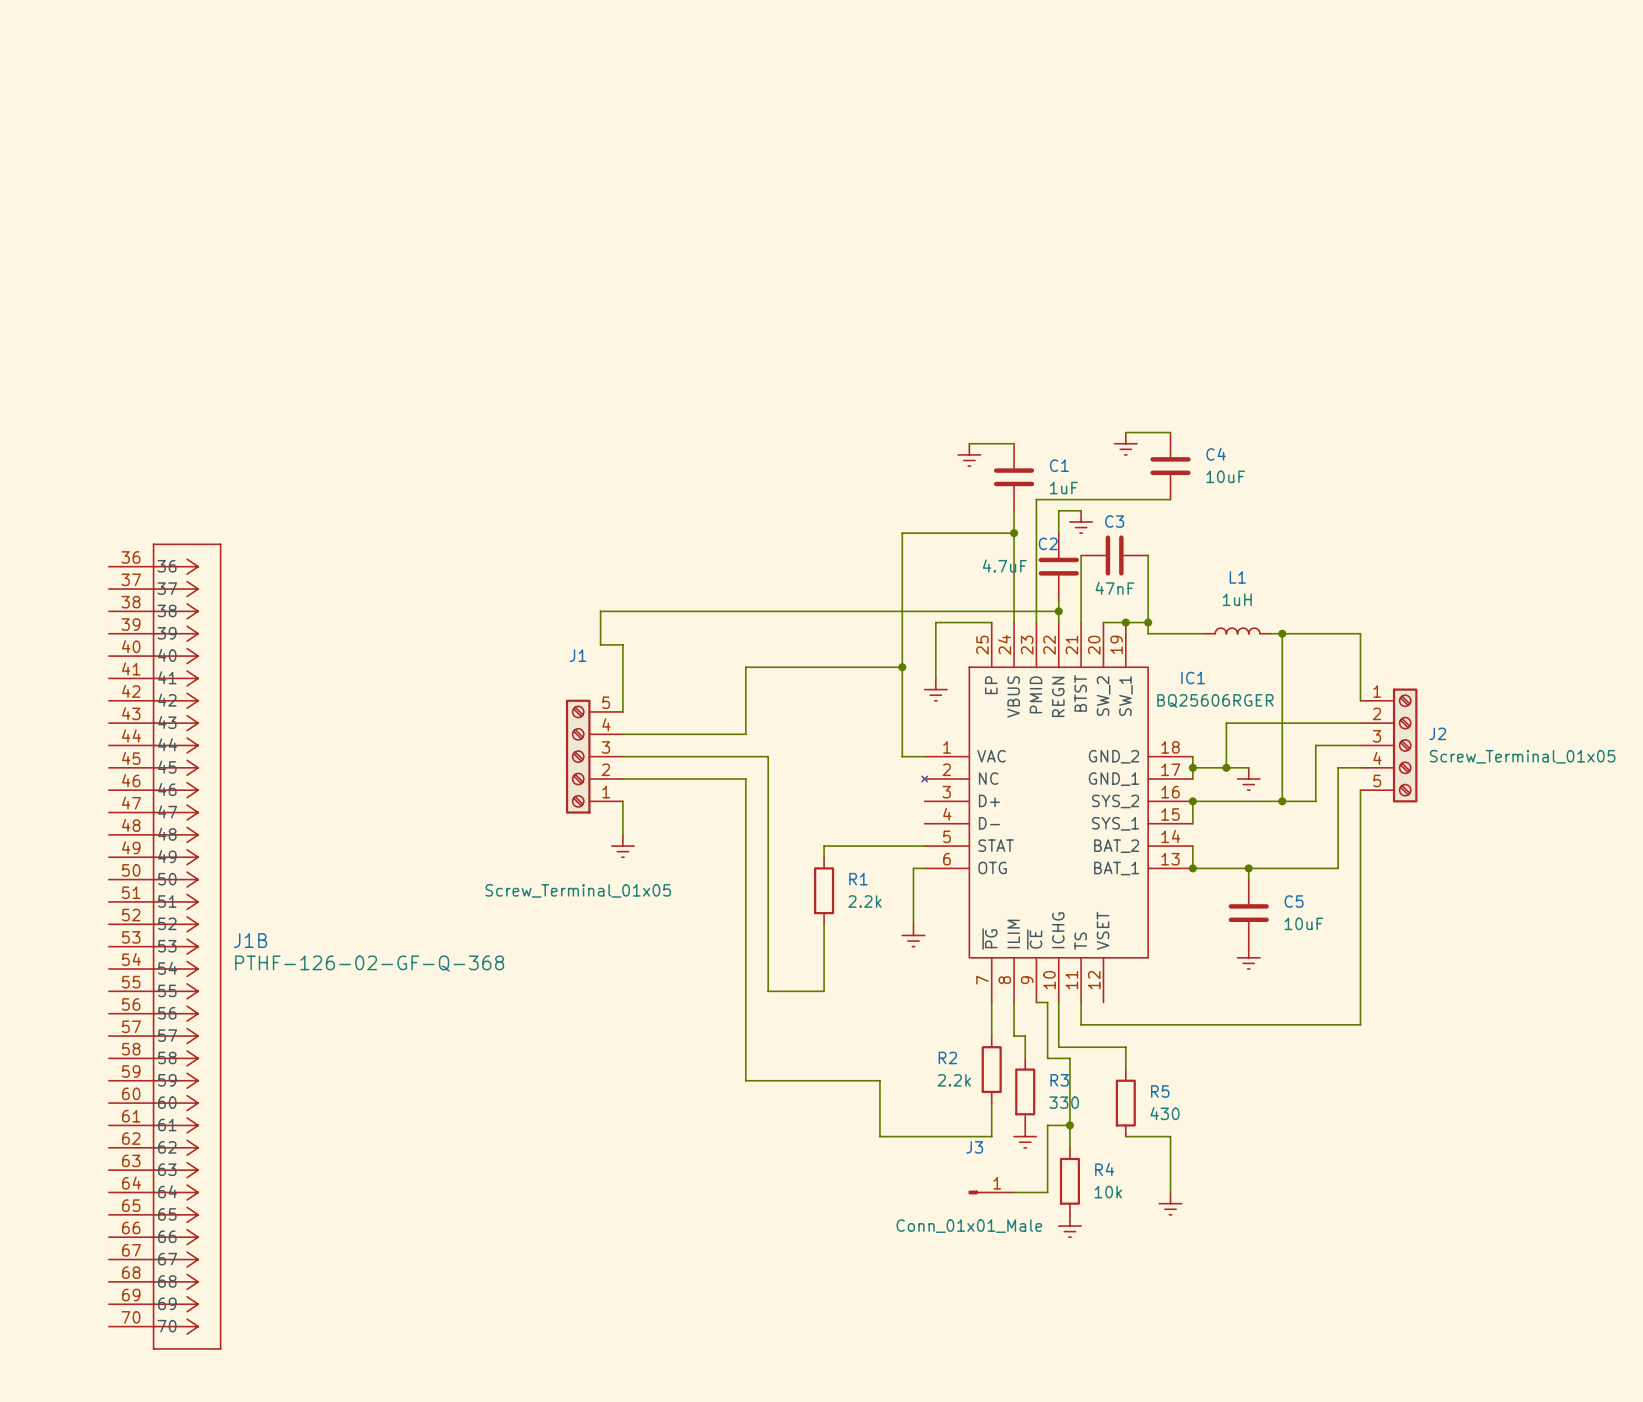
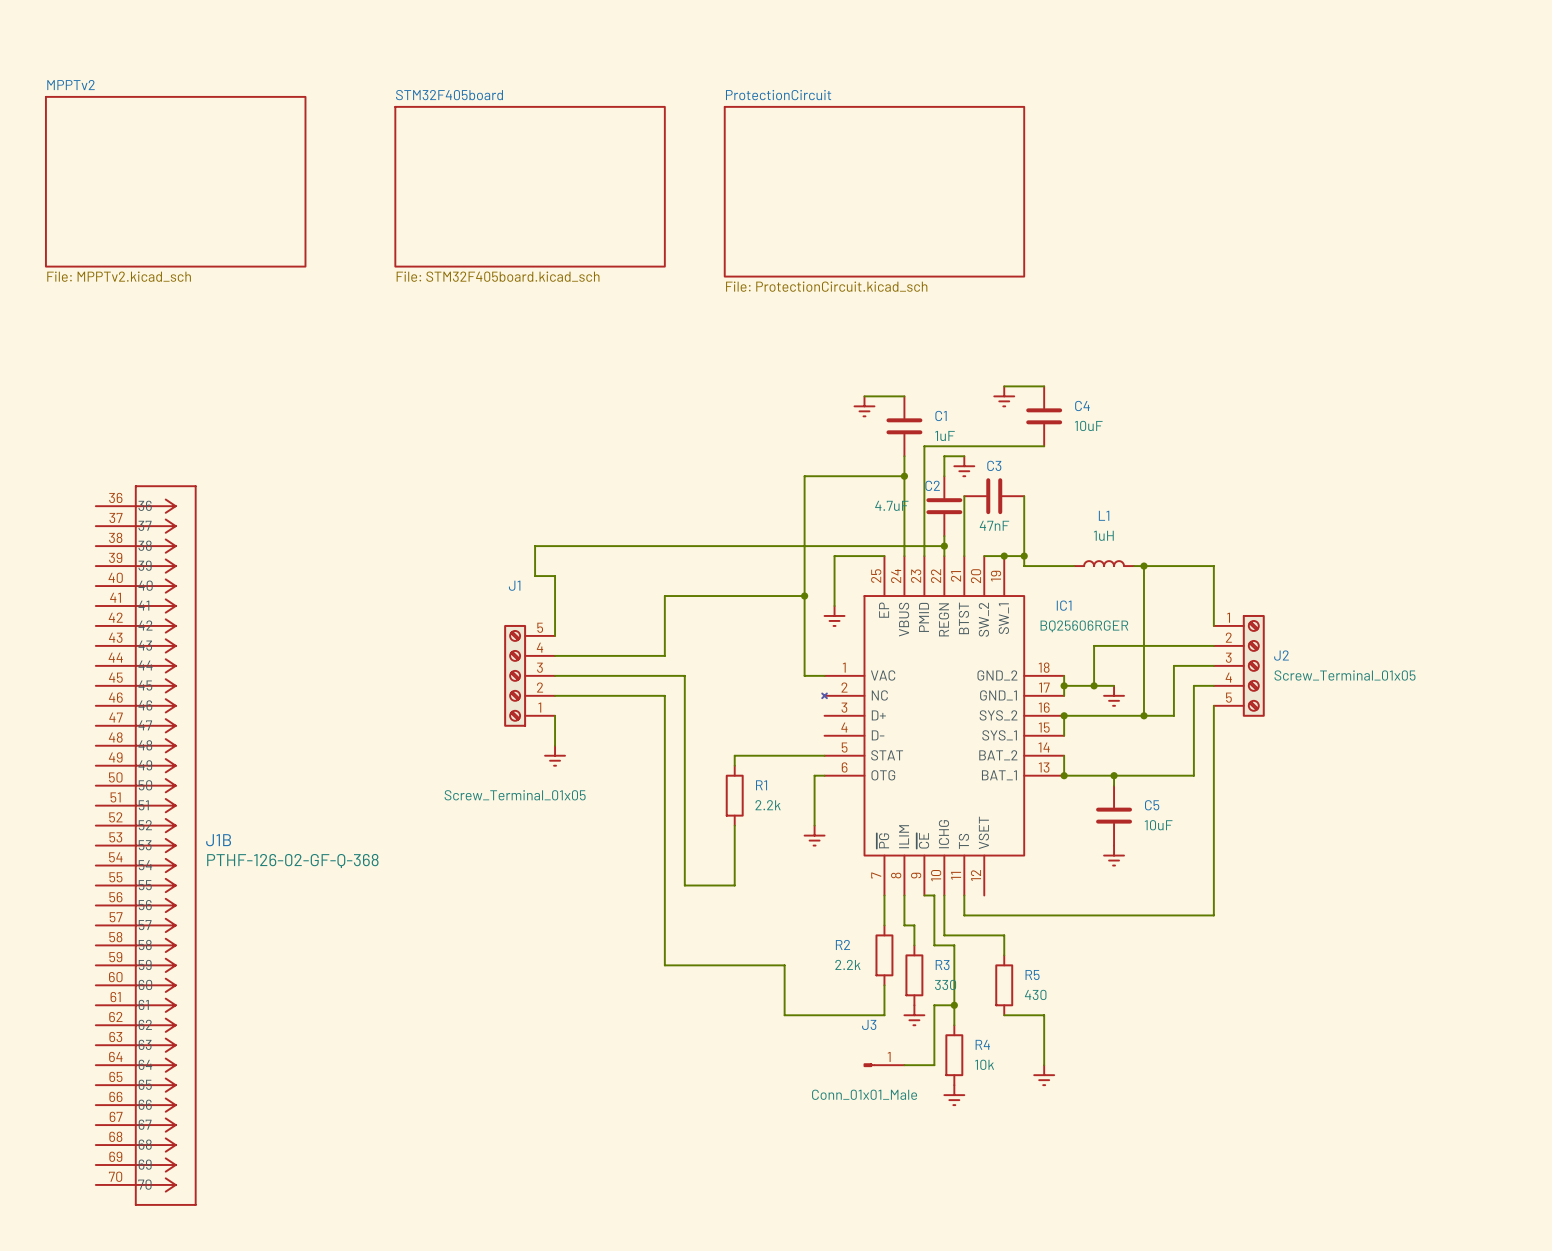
sheet MPPTv2: none -> File: MPPTv2.kicad_sch (175, 181)
sheet STM32F405board: none -> File: STM32F405board.kicad_sch (530, 186)
sheet ProtectionCircuit: none -> File: ProtectionCircuit.kicad_sch (874, 191)

